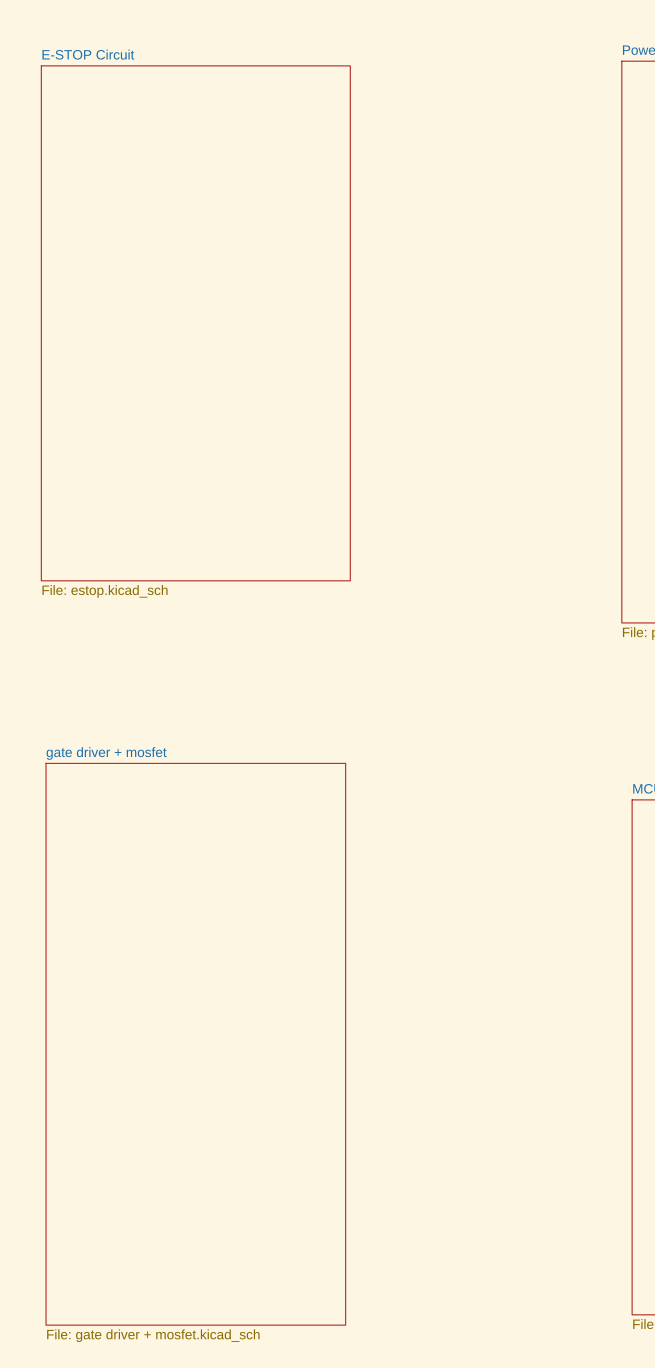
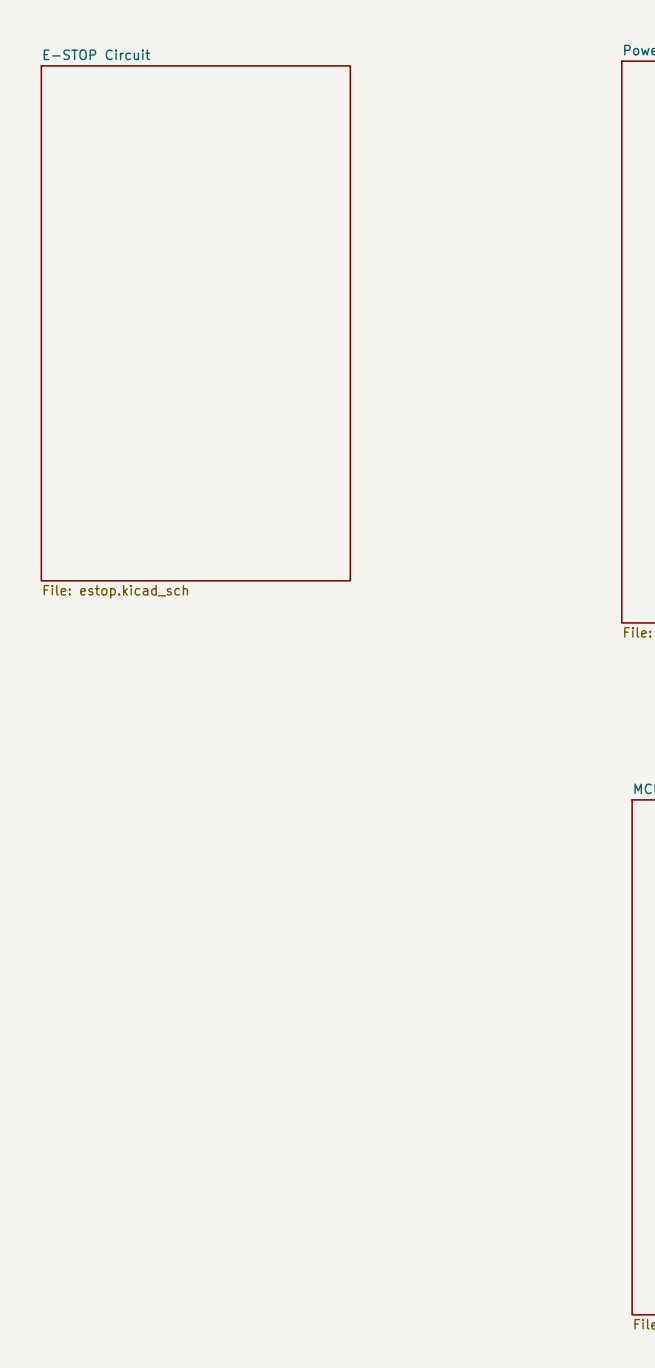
sheet gate driver + mosfet: File: gate driver + mosfet.kicad_sch (195, 1044) -> none

